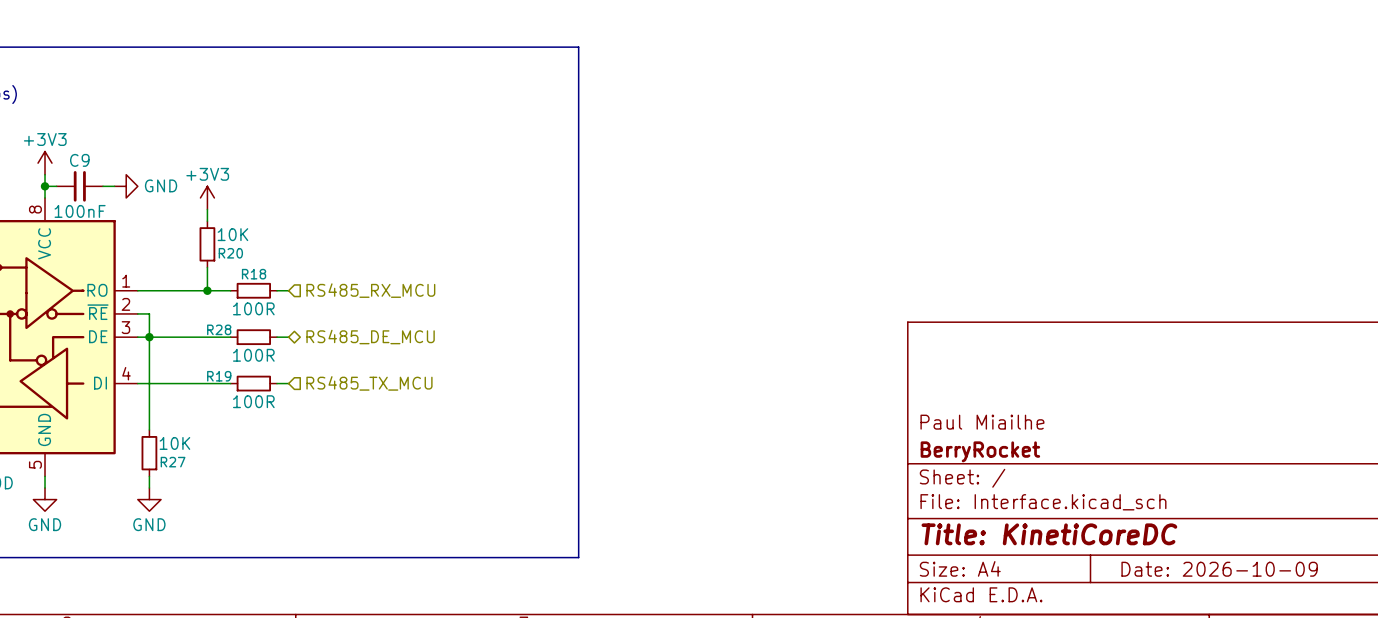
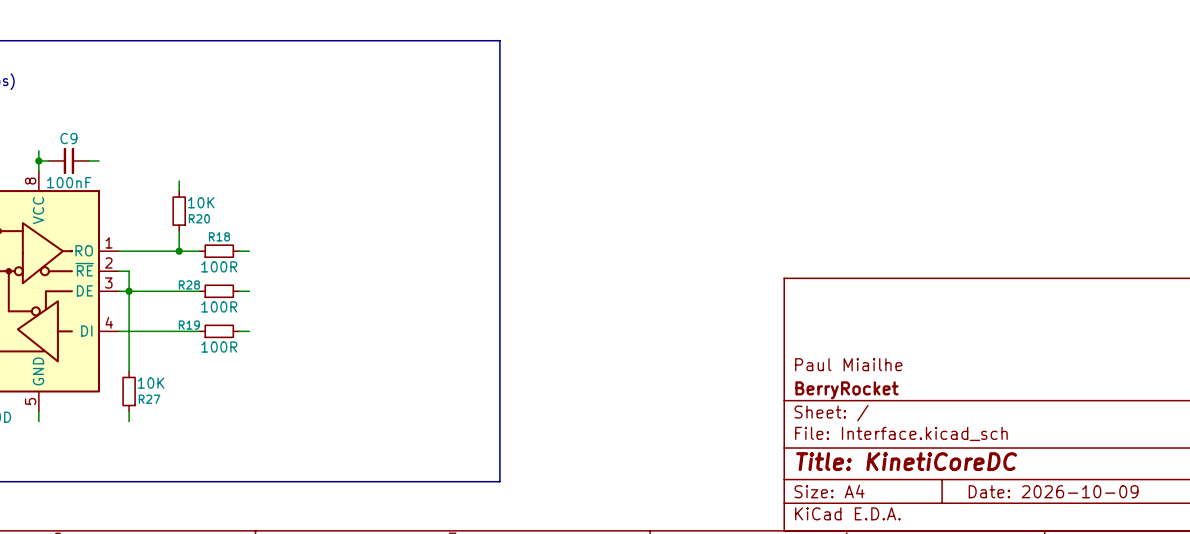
power symbol: +3V3 (45, 163) -> none
power symbol: GND (126, 186) -> none
power symbol: +3V3 (207, 197) -> none
hierarchical label: RS485_RX_MCU (370, 290) -> none
hierarchical label: RS485_DE_MCU (370, 337) -> none
hierarchical label: RS485_TX_MCU (369, 383) -> none
power symbol: GND (45, 499) -> none
power symbol: GND (149, 499) -> none

